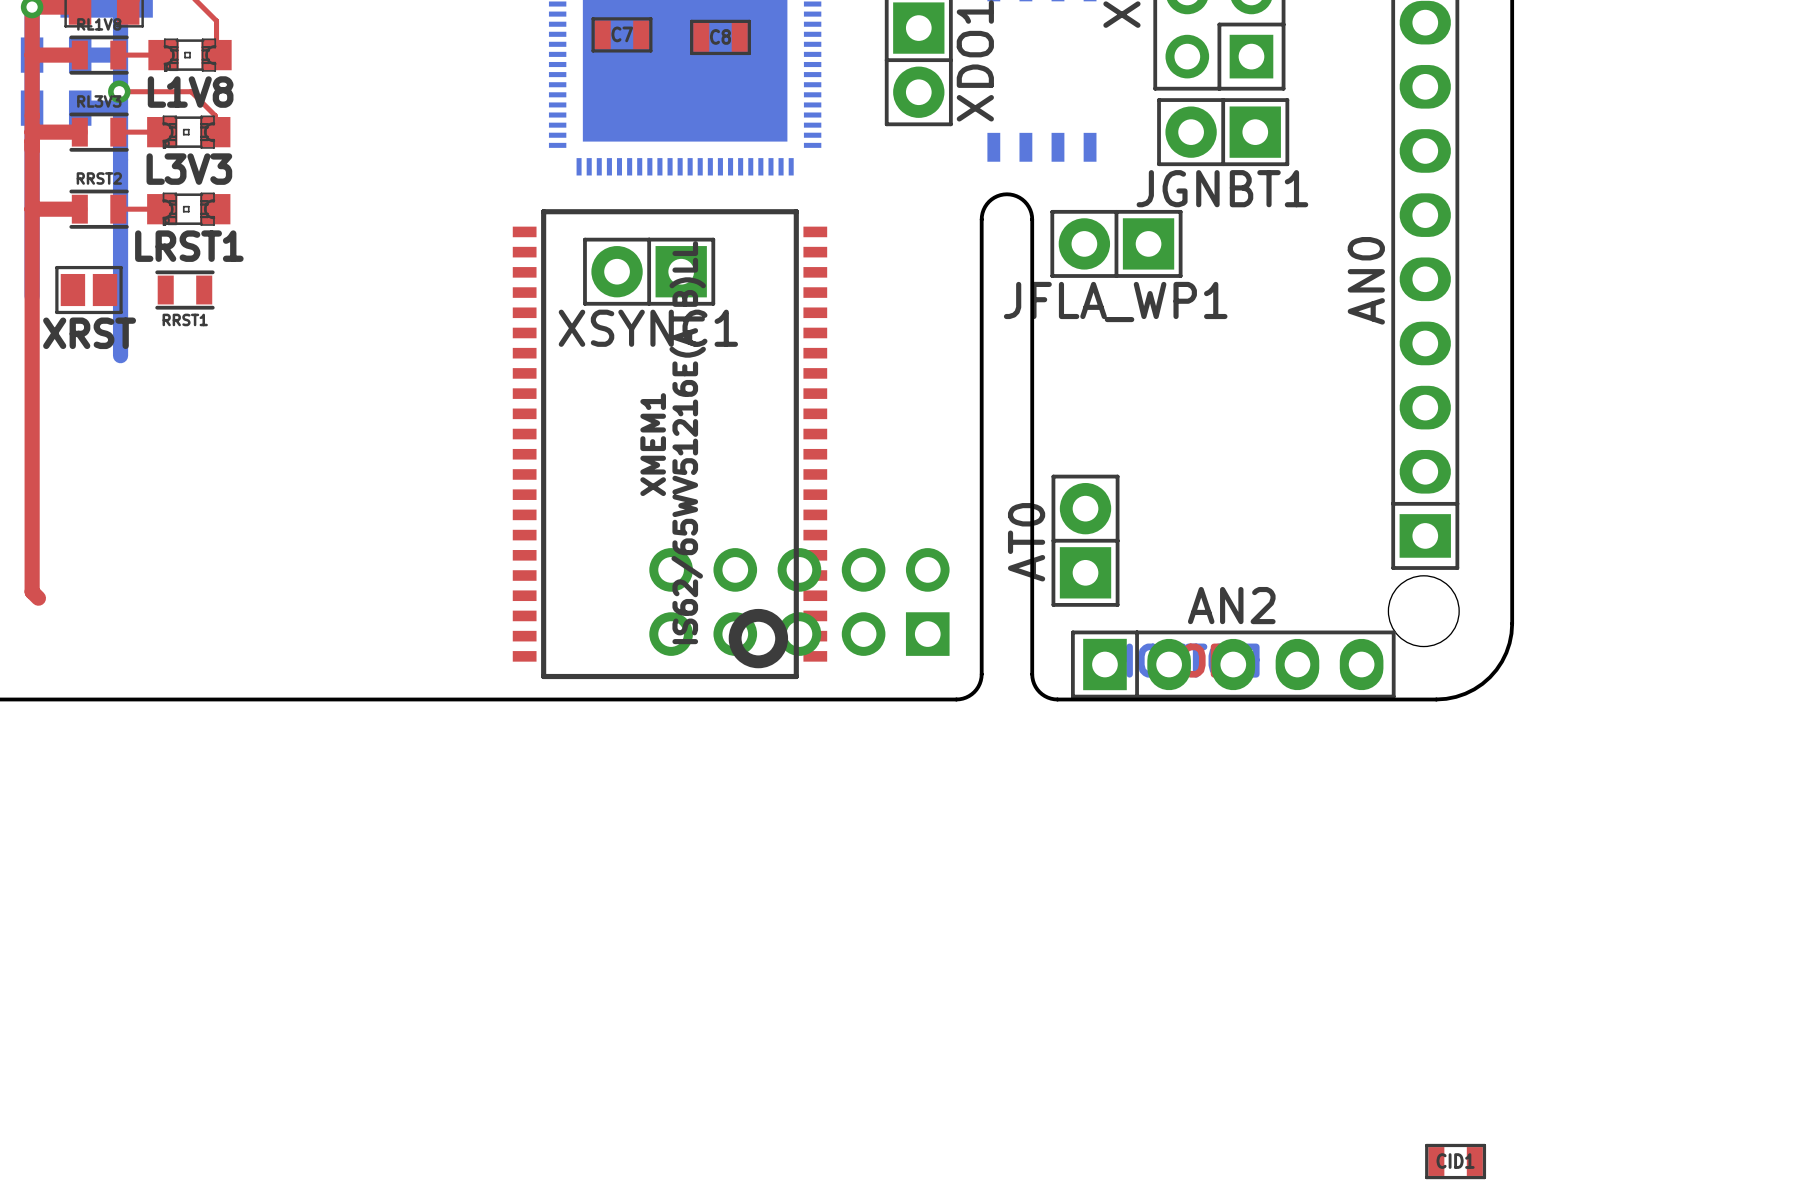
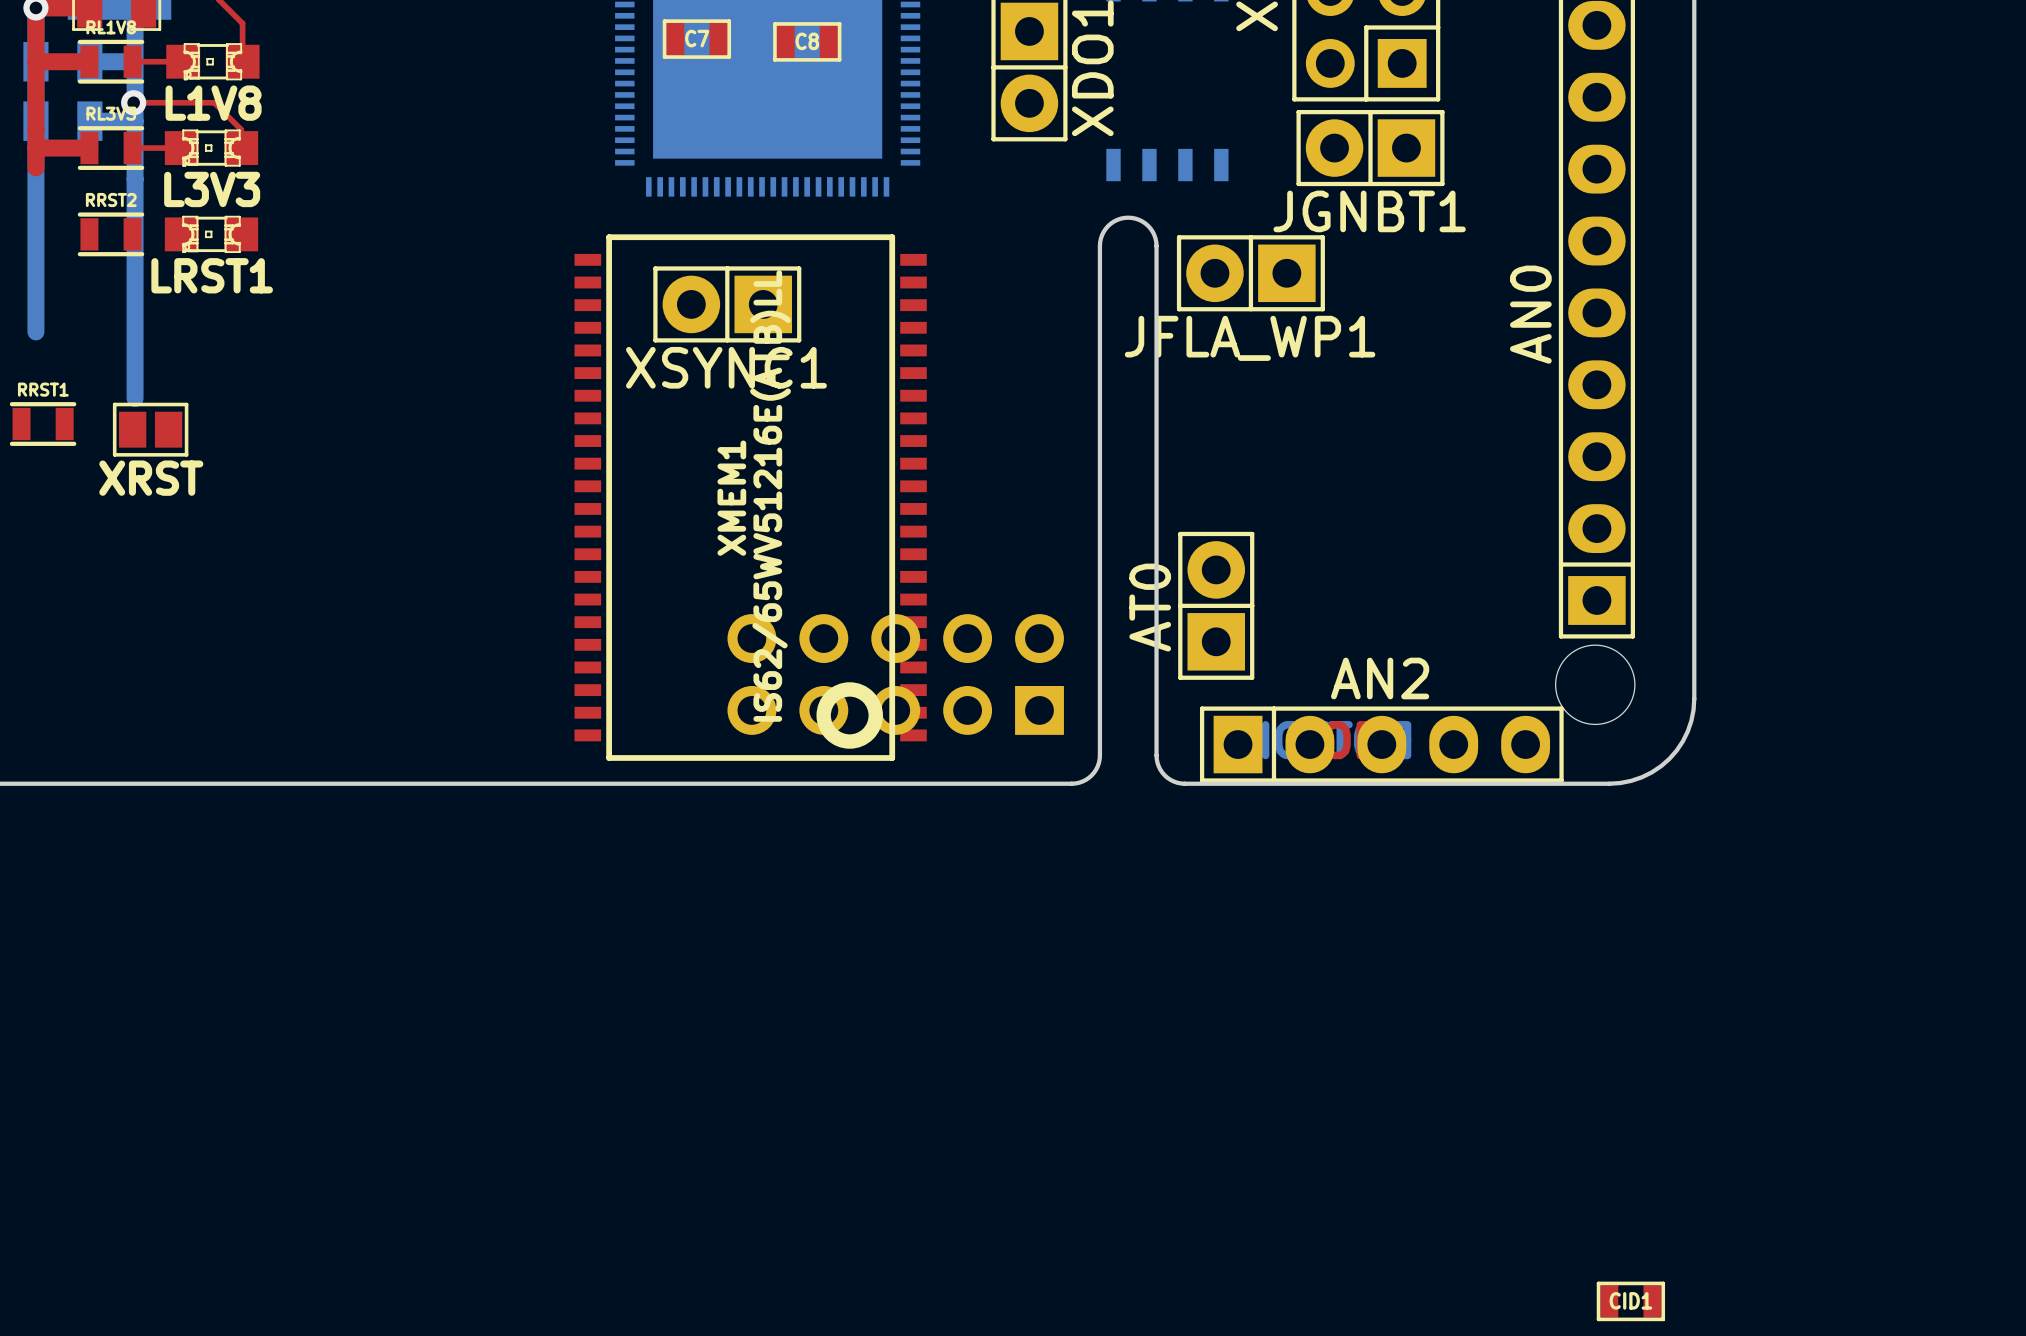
top track: (32, 149) (32, 591) (38, 598) -> none
top track: (32, 209) (79, 209) -> none
top track: (118, 209) (162, 209) -> none
part position: (88, 290) -> (150, 429)
RRST1 position: (184, 290) -> (43, 424)
RRST1 name position: RRST1 (185, 319) -> RRST1 (43, 389)

